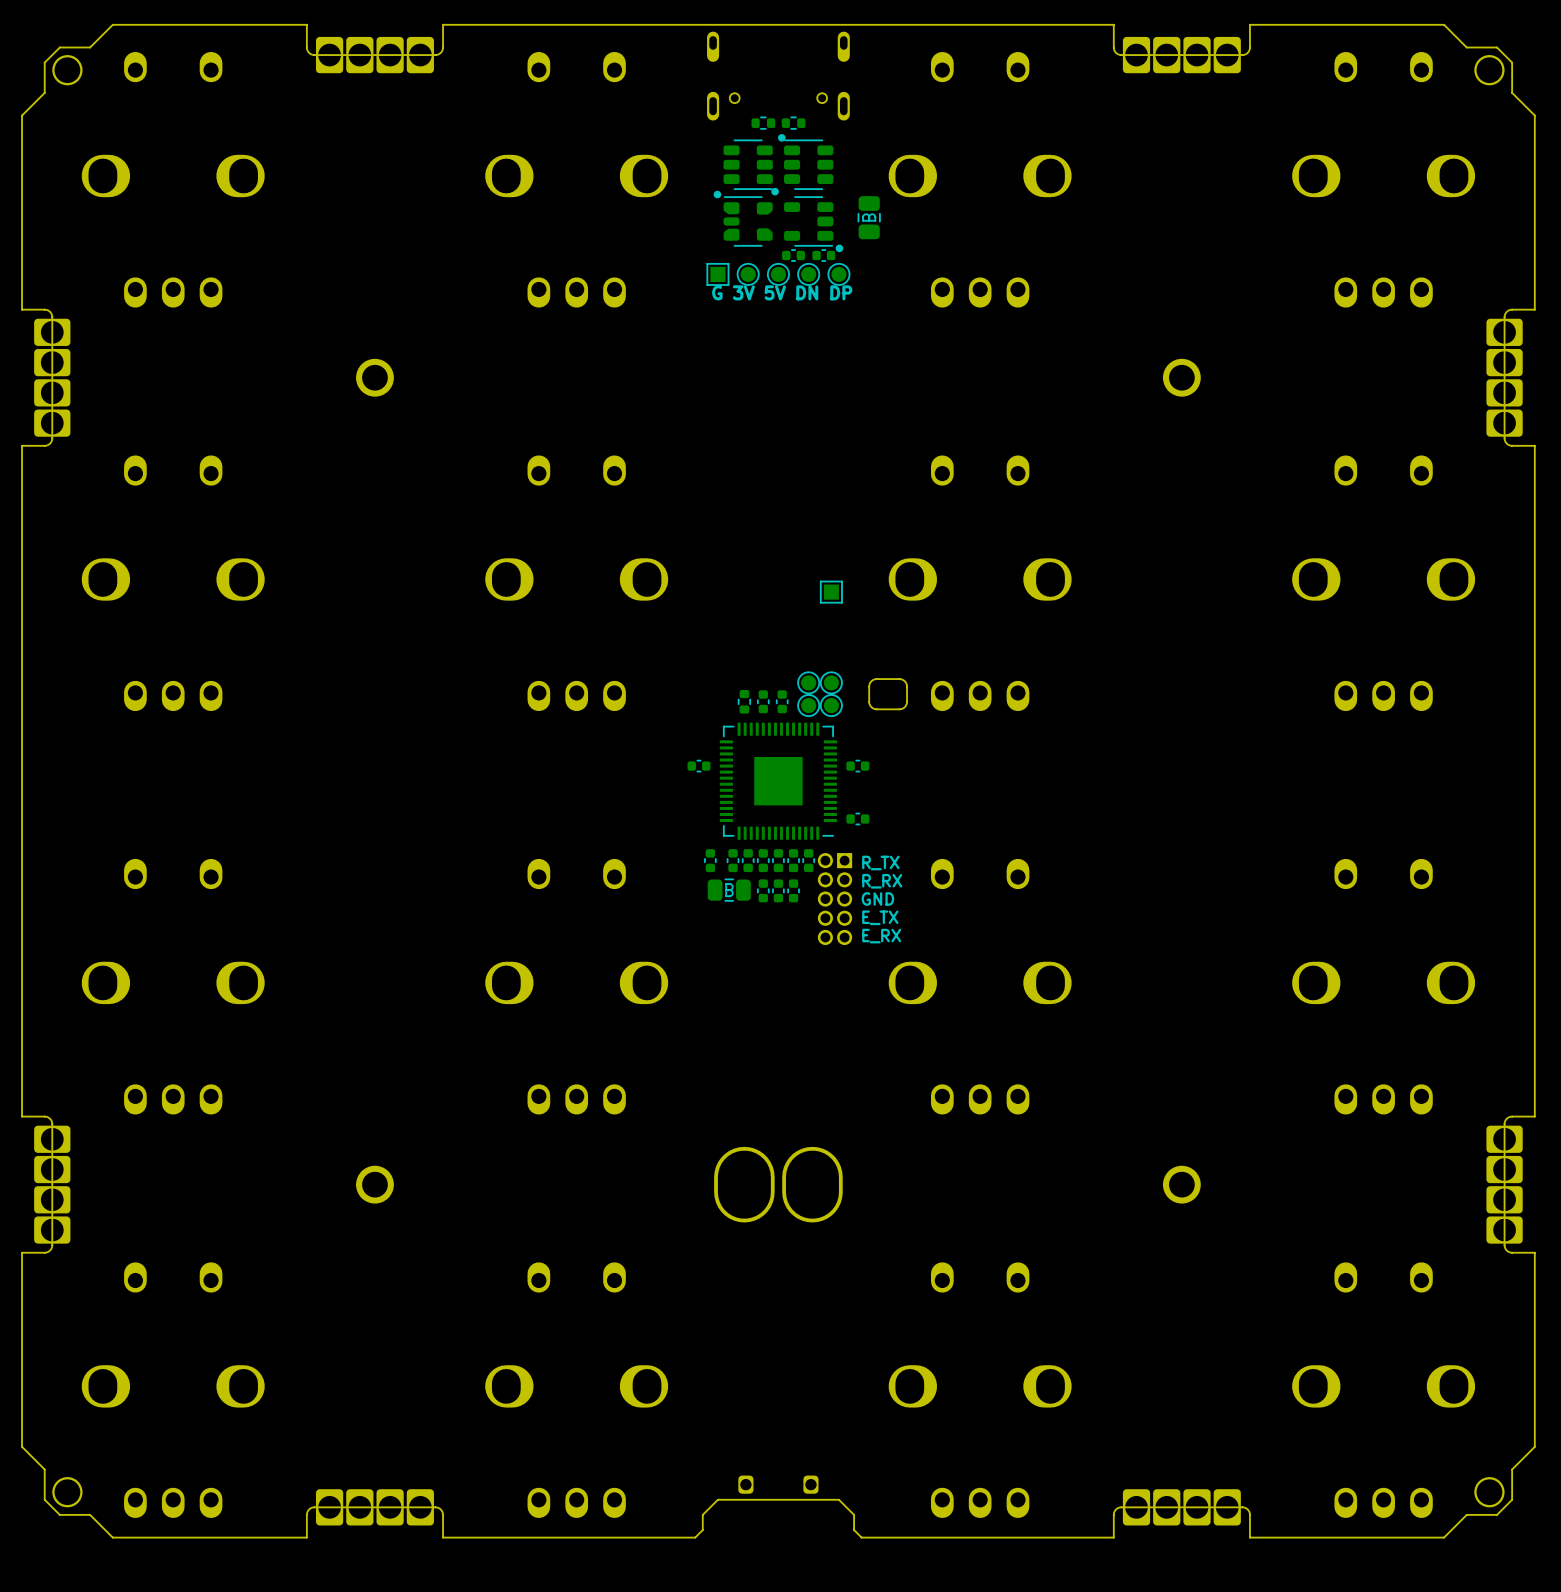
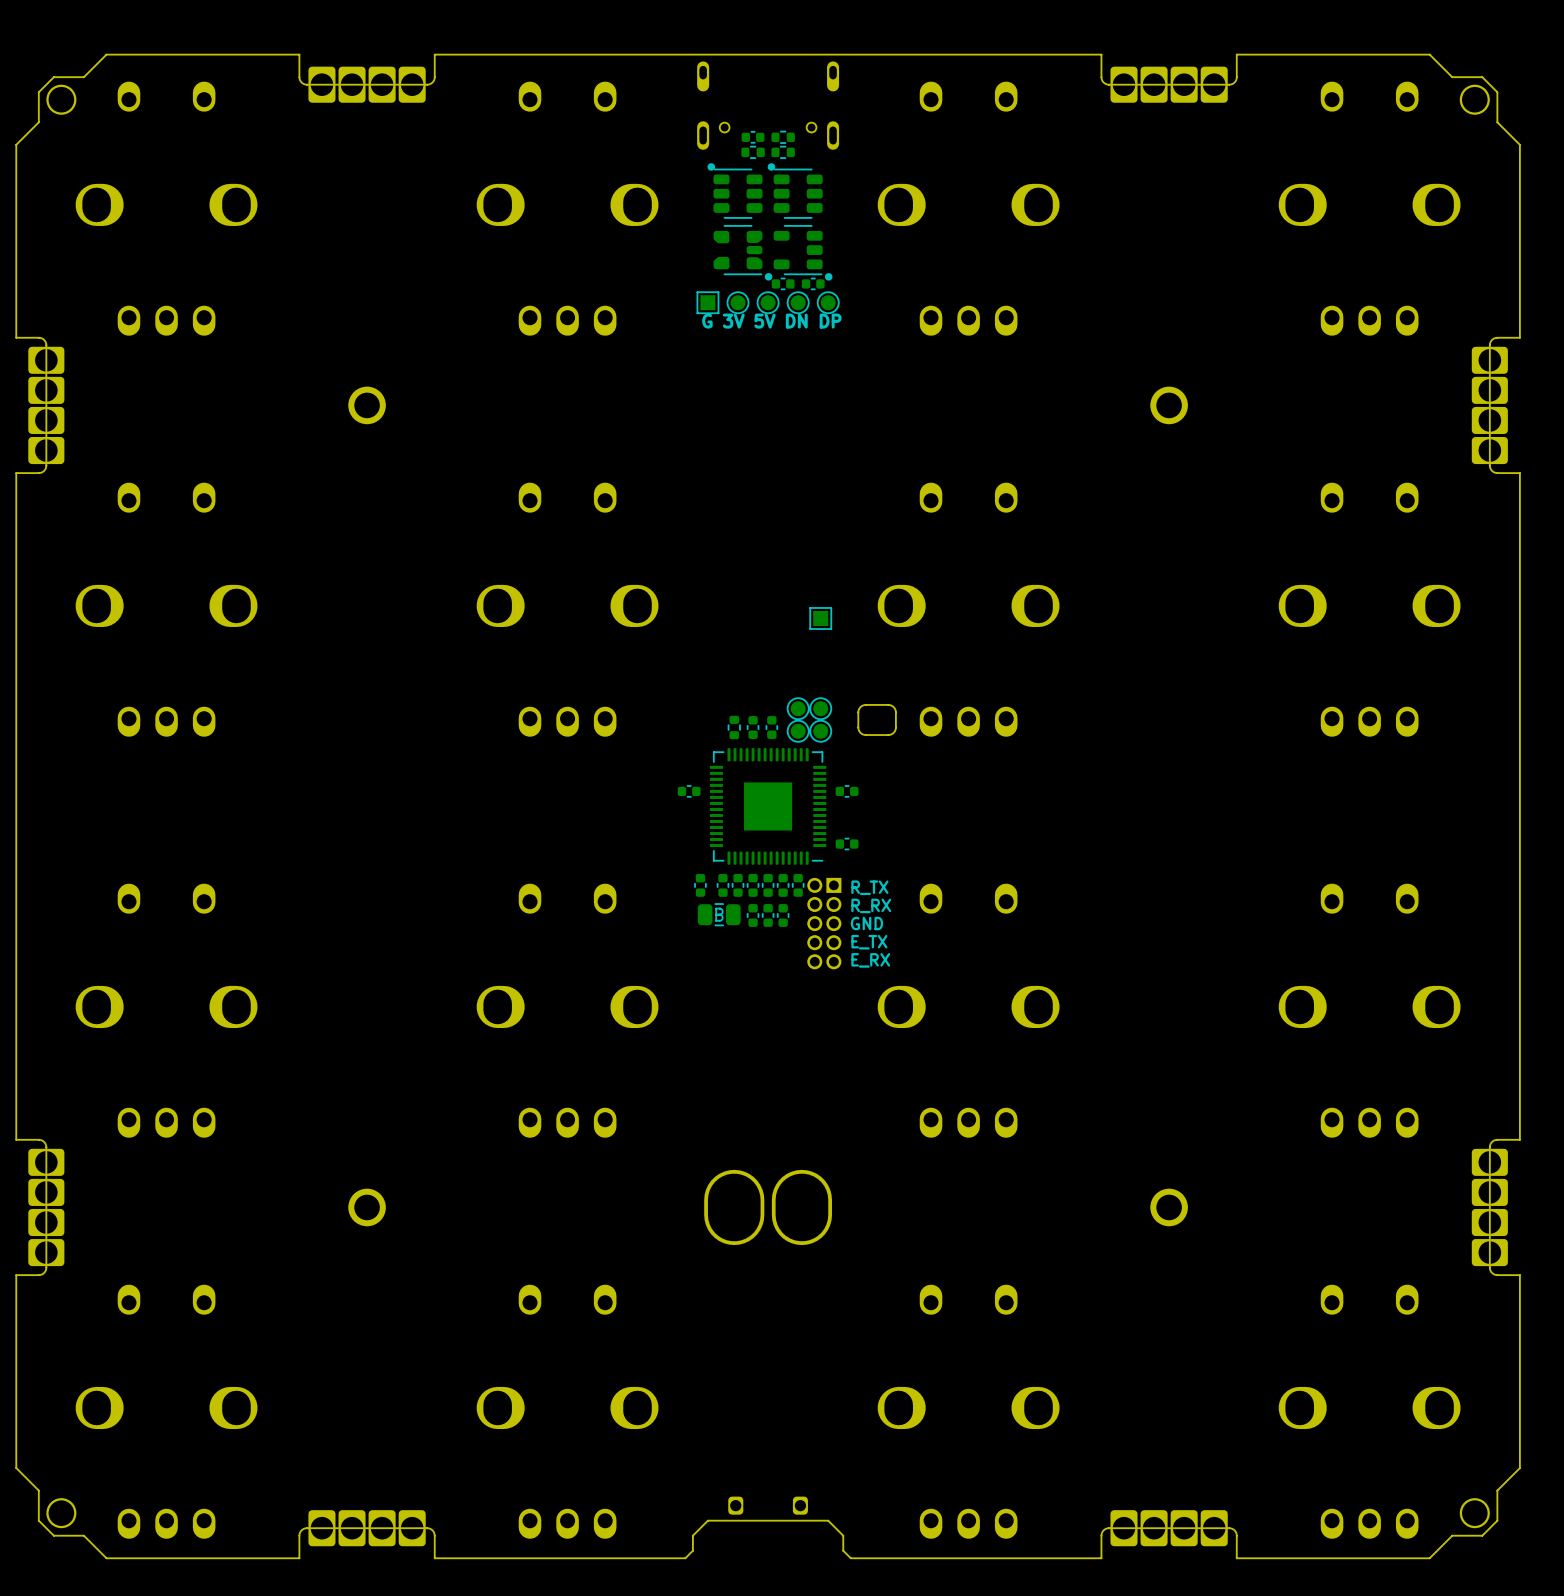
part: none -> (753, 137)
part: none -> (783, 137)
part rotation: 0° (751, 167) -> 180° (735, 191)
part: (869, 217) -> none
part rotation: 0° (743, 218) -> 180° (742, 252)

